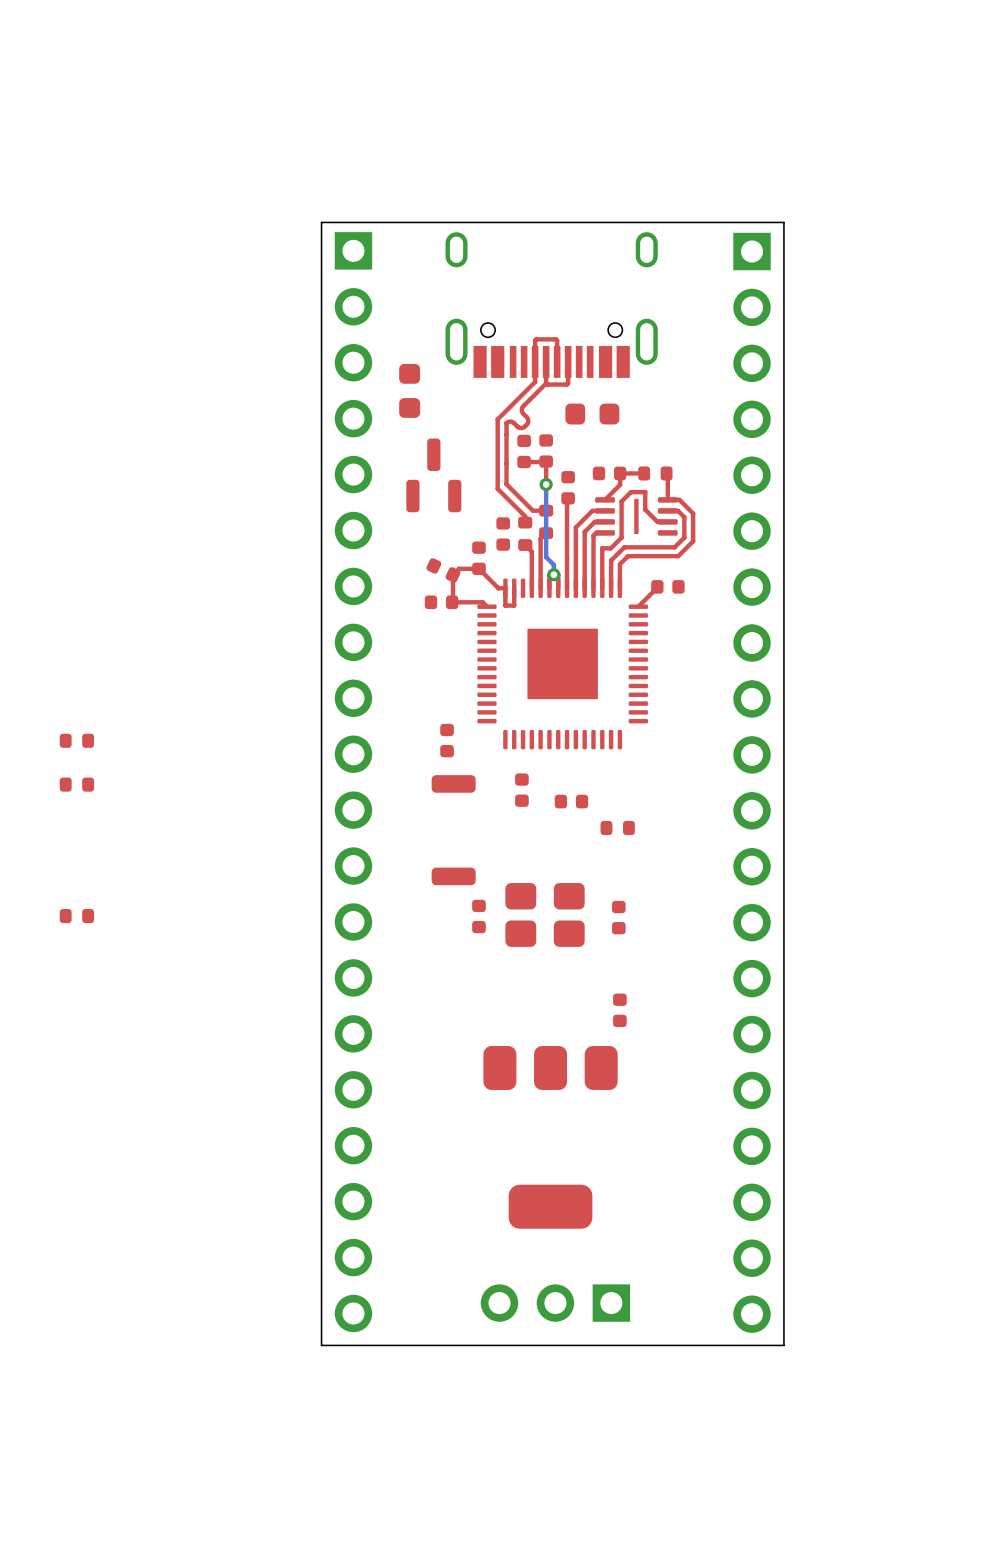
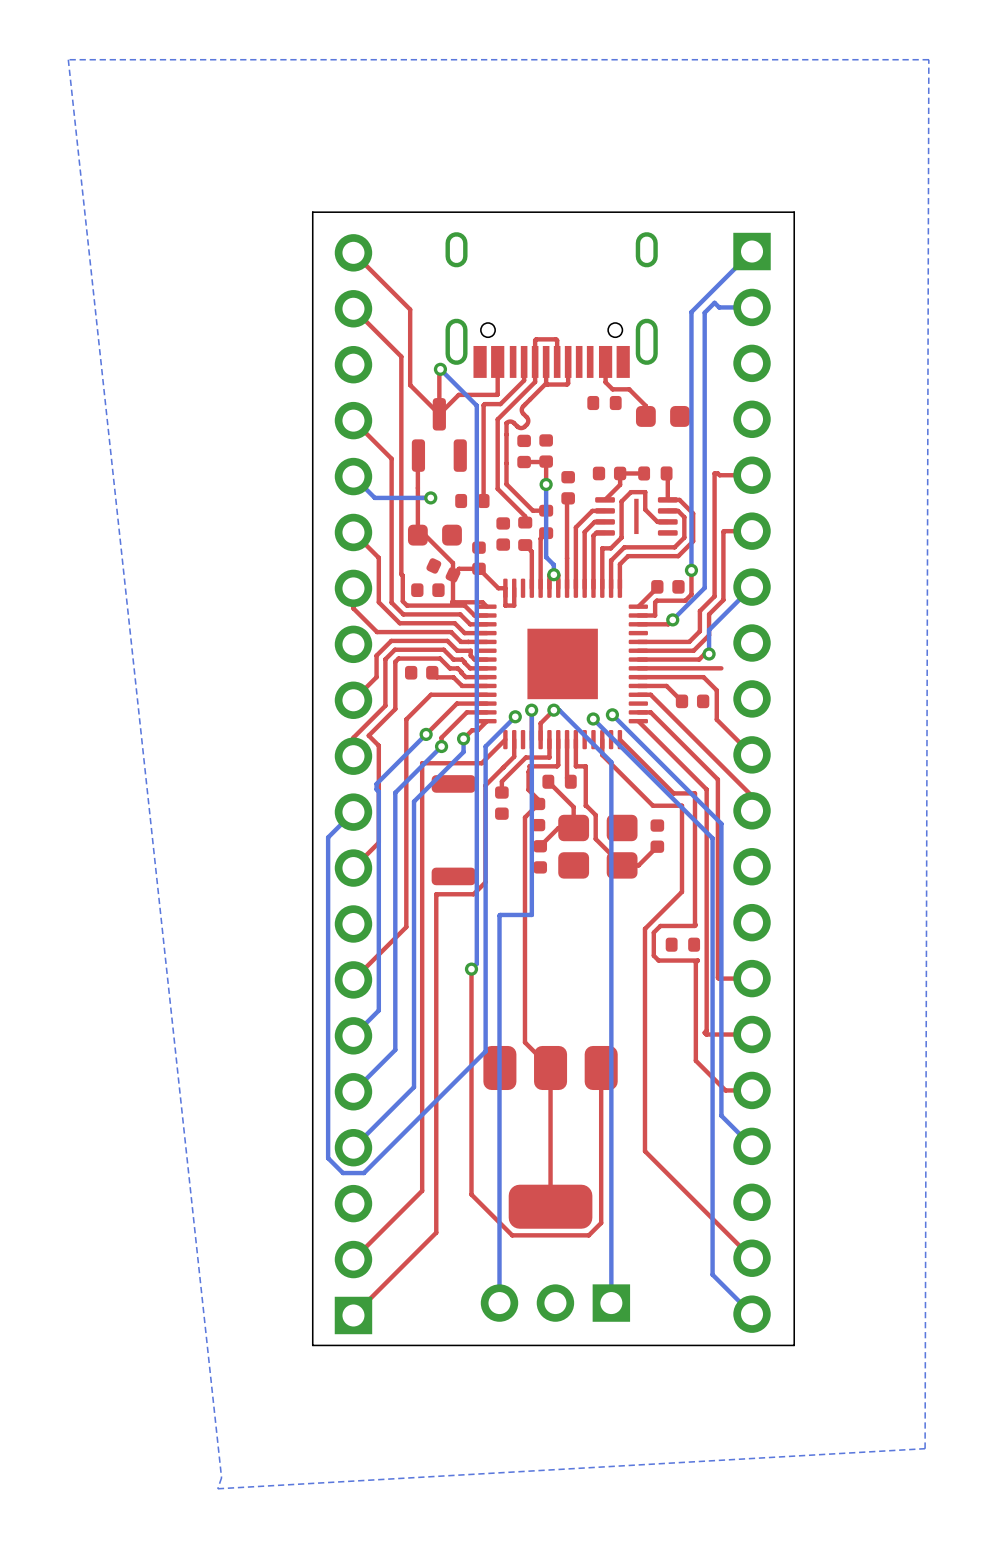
bottom zone outline: none -> (928, 59) (925, 1448) (217, 1488) (221, 1477) (68, 59) (928, 59)
bottom track: none -> (752, 251) (691, 312) (691, 570)
top track: none -> (353, 252) (410, 309) (410, 385) (439, 414)
bottom track: none -> (752, 307) (719, 307) (714, 302) (704, 312) (704, 587) (672, 619)
top track: none -> (353, 308) (401, 356) (402, 601) (407, 605) (464, 605) (474, 615) (486, 615)
top track: none -> (497, 361) (497, 394) (458, 394) (439, 414)
top track: none -> (524, 361) (524, 380) (500, 404) (483, 405) (483, 501)
top track: none -> (605, 361) (605, 382) (612, 389) (629, 389) (645, 405) (645, 416)
top track: none -> (440, 369) (439, 414)
bottom track: none -> (440, 369) (476, 405) (476, 963) (471, 969)
via: none -> (440, 369)
part: (409, 390) -> none
part footprint: [565, 403, 620, 425] -> [587, 395, 622, 411]
part: none -> (662, 416)
top track: none -> (353, 420) (391, 458) (391, 602) (403, 614) (460, 614) (470, 624) (486, 624)
top track: none -> (418, 455) (417, 535) (425, 535) (453, 563) (453, 574)
part position: (433, 475) -> (439, 434)
top track: none -> (752, 475) (719, 475) (714, 473) (714, 596) (699, 611) (699, 631) (689, 641) (638, 641)
bottom track: none -> (353, 476) (374, 497) (430, 497)
via: none -> (430, 497)
part: none -> (472, 501)
top track: none -> (752, 531) (723, 531) (723, 600) (709, 614) (709, 635) (693, 650) (638, 650)
top track: none -> (353, 532) (378, 557) (378, 602) (399, 623) (454, 623) (464, 633) (486, 633)
part: none -> (434, 535)
top track: none -> (691, 570) (691, 594) (685, 600) (656, 600) (655, 615) (638, 615)
via: none -> (691, 570)
bottom track: none -> (752, 587) (709, 630) (709, 654)
top track: none -> (353, 588) (353, 608) (377, 632) (451, 632) (461, 641) (486, 641)
part position: (441, 602) -> (427, 590)
top track: none -> (672, 619) (668, 624) (638, 624)
via: none -> (672, 619)
top track: none -> (709, 654) (704, 654) (699, 659) (638, 659)
via: none -> (709, 654)
top track: none -> (486, 659) (474, 659) (470, 655) (470, 650) (457, 650) (447, 640) (391, 640) (376, 655) (376, 677) (353, 700)
top track: none -> (486, 668) (470, 668) (462, 659) (453, 659) (443, 649) (394, 649) (385, 659) (385, 705) (353, 737) (353, 756)
top track: none -> (721, 668) (638, 668)
part: none -> (421, 672)
top track: none -> (432, 672) (436, 677) (453, 677) (462, 685) (486, 685)
top track: none -> (486, 677) (465, 677) (457, 668) (449, 668) (440, 658) (398, 658) (395, 661) (395, 709) (368, 735) (378, 745) (378, 842) (353, 868)
top track: none -> (638, 677) (703, 677) (716, 690) (716, 719) (752, 754)
top track: none -> (638, 685) (666, 685) (681, 701)
top track: none -> (486, 694) (430, 694) (406, 719) (406, 927) (353, 979)
top track: none -> (638, 694) (650, 694) (752, 796) (752, 810)
part: none -> (692, 701)
top track: none -> (486, 703) (456, 703) (426, 734)
bottom track: none -> (531, 710) (531, 914) (499, 915) (499, 1303)
via: none -> (531, 710)
top track: none -> (553, 710) (540, 723) (540, 739)
bottom track: none -> (553, 710) (559, 710) (611, 762) (611, 1303)
via: none -> (553, 710)
top track: none -> (486, 712) (466, 712) (441, 737) (441, 746)
top track: none -> (638, 712) (650, 712) (717, 779) (717, 977) (752, 978)
bottom track: none -> (612, 714) (721, 823) (721, 1115) (752, 1146)
via: none -> (612, 714)
bottom track: none -> (515, 716) (485, 746) (485, 1051) (363, 1173) (342, 1173) (328, 1158) (328, 837) (353, 812)
via: none -> (515, 716)
bottom track: none -> (593, 718) (712, 838) (712, 1274) (752, 1314)
via: none -> (593, 718)
top track: none -> (481, 721) (486, 721) (477, 730) (472, 730) (463, 738)
top track: none -> (638, 721) (706, 789) (706, 1030) (704, 1032) (706, 1034) (752, 1034)
bottom track: none -> (426, 734) (376, 783) (376, 789) (378, 791) (378, 1010) (353, 1035)
via: none -> (426, 734)
bottom track: none -> (463, 738) (463, 752) (414, 801) (414, 1087) (353, 1147)
via: none -> (463, 738)
top track: none -> (505, 739) (481, 763) (422, 763) (422, 1190) (353, 1259)
top track: none -> (514, 739) (514, 756) (485, 785) (485, 882) (473, 894) (436, 894) (436, 1232) (353, 1315)
top track: none -> (549, 739) (549, 757) (525, 757) (501, 781) (501, 792)
top track: none -> (558, 739) (557, 766) (529, 766) (528, 789) (538, 799) (538, 803) (524, 817) (524, 1042) (550, 1067) (550, 1206)
top track: none -> (567, 739) (567, 778) (570, 781)
top track: none -> (575, 739) (575, 766) (585, 766) (585, 805) (595, 815) (595, 839) (622, 865) (638, 865) (657, 846)
top track: none -> (602, 739) (602, 755) (652, 805) (681, 805) (681, 891) (644, 928) (644, 1151) (752, 1258)
top track: none -> (619, 739) (673, 793) (694, 793) (695, 925) (660, 925) (653, 932) (653, 955) (658, 960) (697, 960) (695, 962) (695, 1060) (725, 1090) (752, 1090)
part: (76, 740) -> none
part: (447, 740) -> none
bottom track: none -> (441, 746) (395, 792) (395, 1049) (353, 1091)
via: none -> (441, 746)
top track: none -> (548, 781) (573, 807) (573, 827)
part: none -> (559, 781)
part rotation: 0° (353, 782) -> 180° (353, 784)
part: (76, 784) -> none
part: (521, 790) -> none
part: (571, 801) -> none
part: none -> (501, 803)
part: none -> (538, 814)
top track: none -> (573, 827) (558, 827) (540, 846)
part: (617, 827) -> none
part: none -> (657, 836)
part: none -> (540, 856)
part position: (545, 914) -> (597, 846)
part: (76, 916) -> none
part: (478, 916) -> none
part: (618, 917) -> none
part: none -> (682, 944)
top track: none -> (471, 969) (471, 1194) (512, 1235) (588, 1235) (601, 1223) (601, 1067)
via: none -> (471, 969)
part: (619, 1010) -> none
board edge: (783, 1345) (783, 222) (321, 222) (321, 1345) -> (783, 1345) (794, 1345) (794, 212) (312, 212) (312, 1345) (321, 1345)

